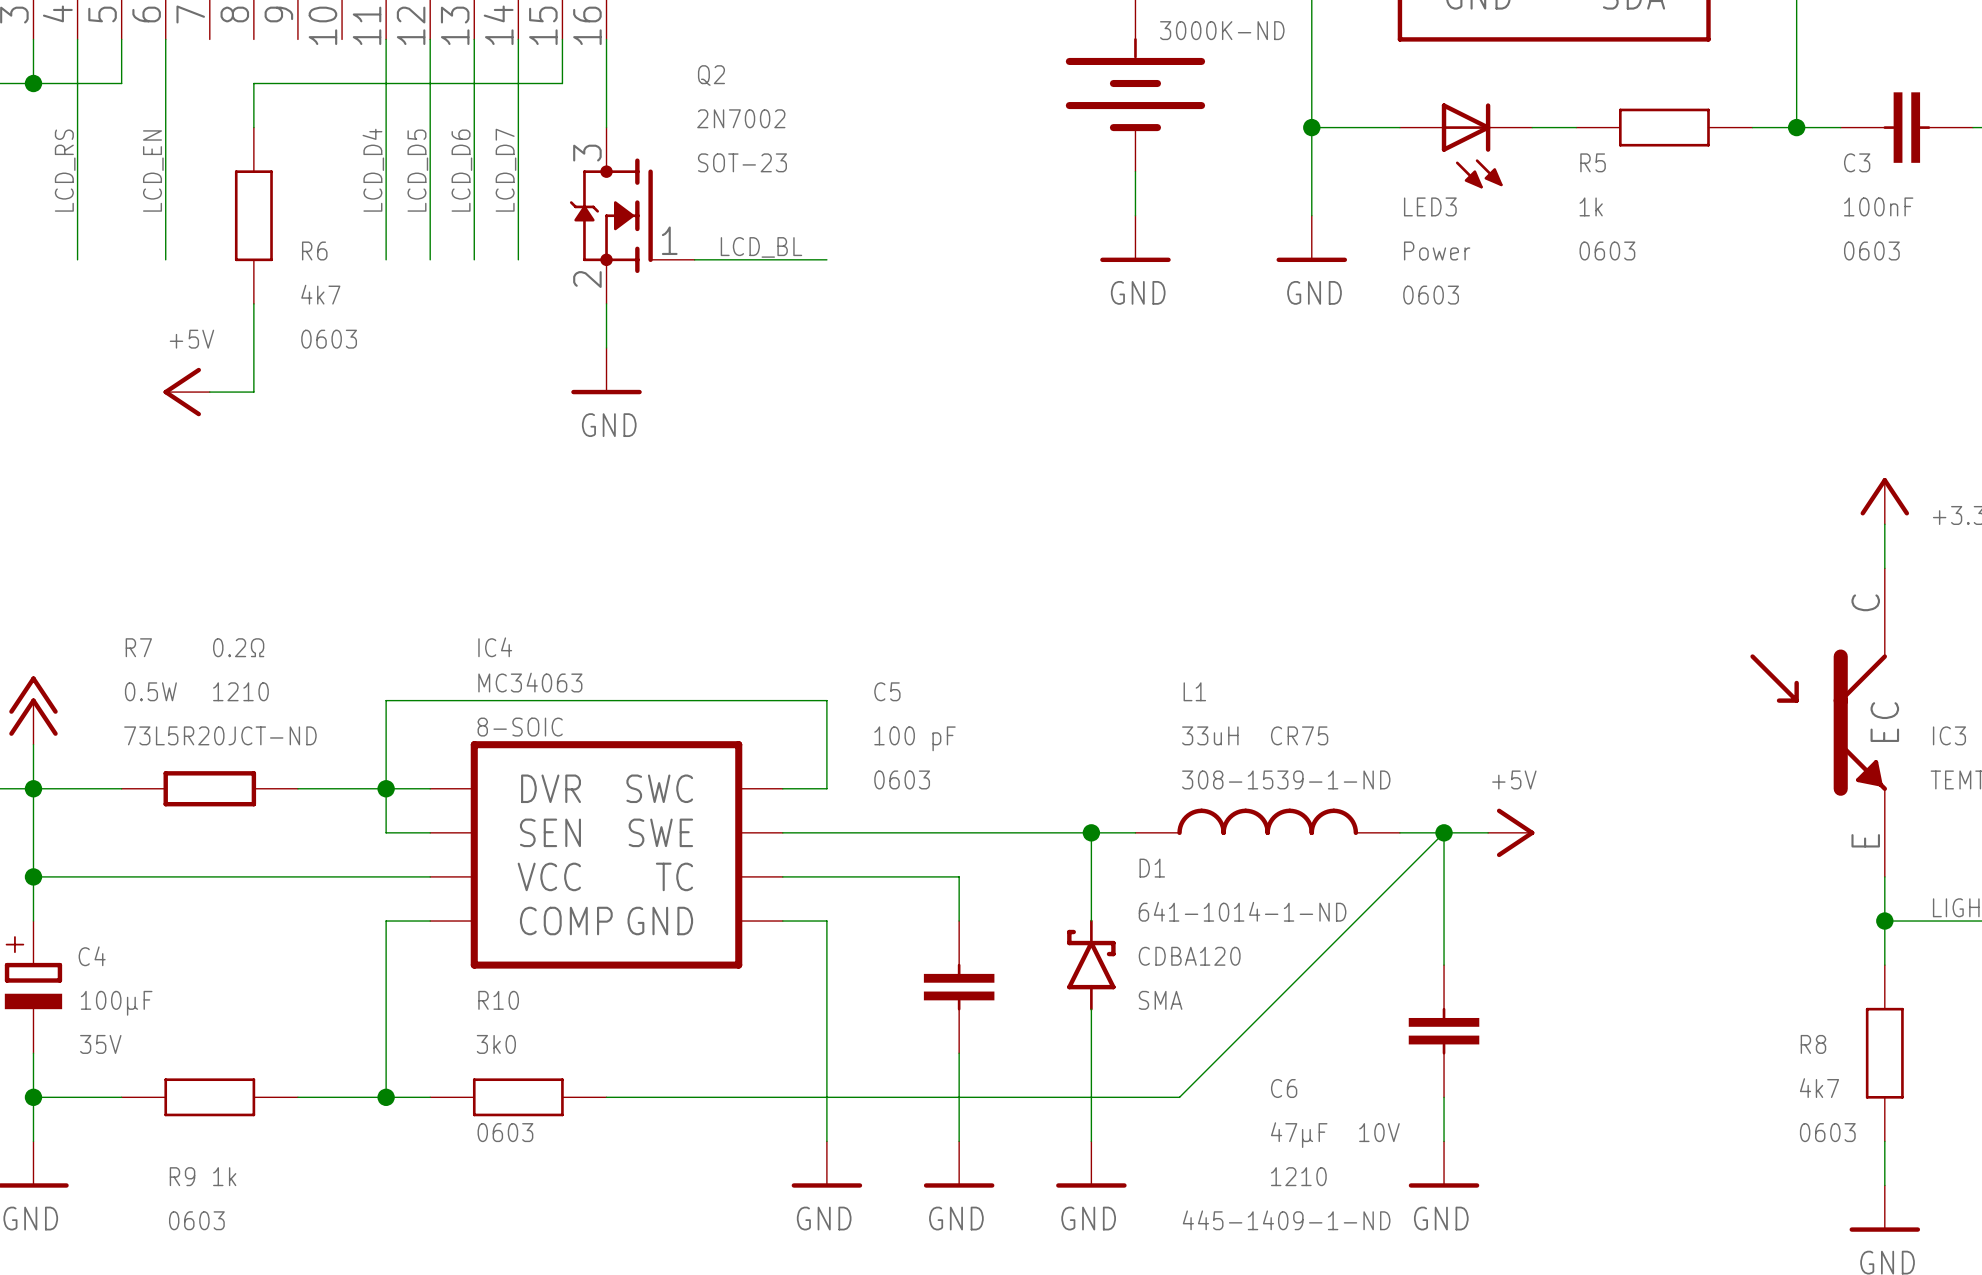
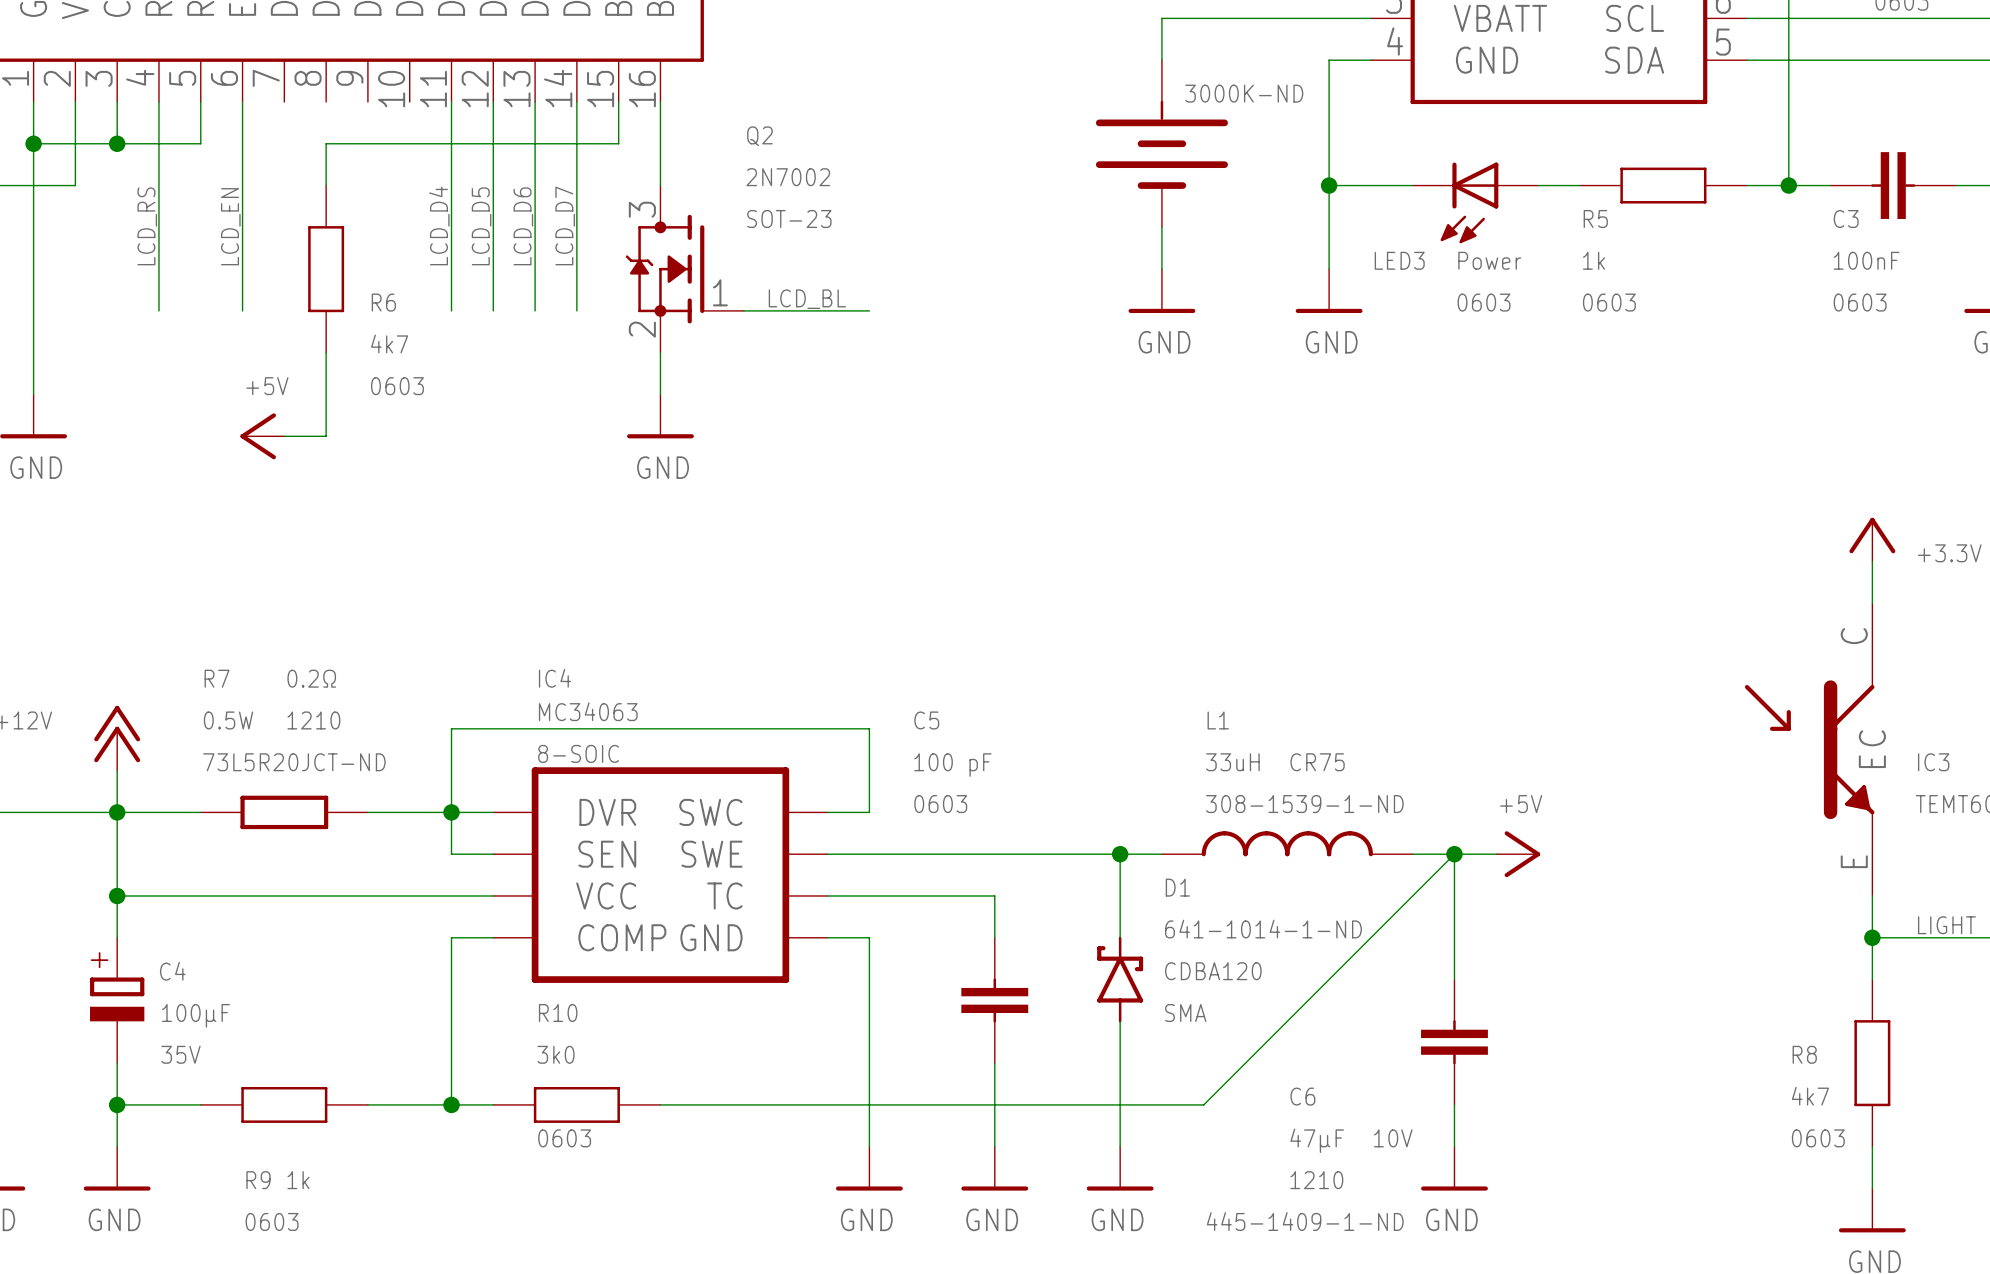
LED3 flip: as is (1472, 145) -> left-right (1469, 202)
LED3 name position: LED3 (1430, 206) -> LED3 (1399, 260)
LED3 value position: Power (1437, 251) -> Power (1489, 260)
LED3 text position: 0603 (1431, 295) -> 0603 (1484, 302)

